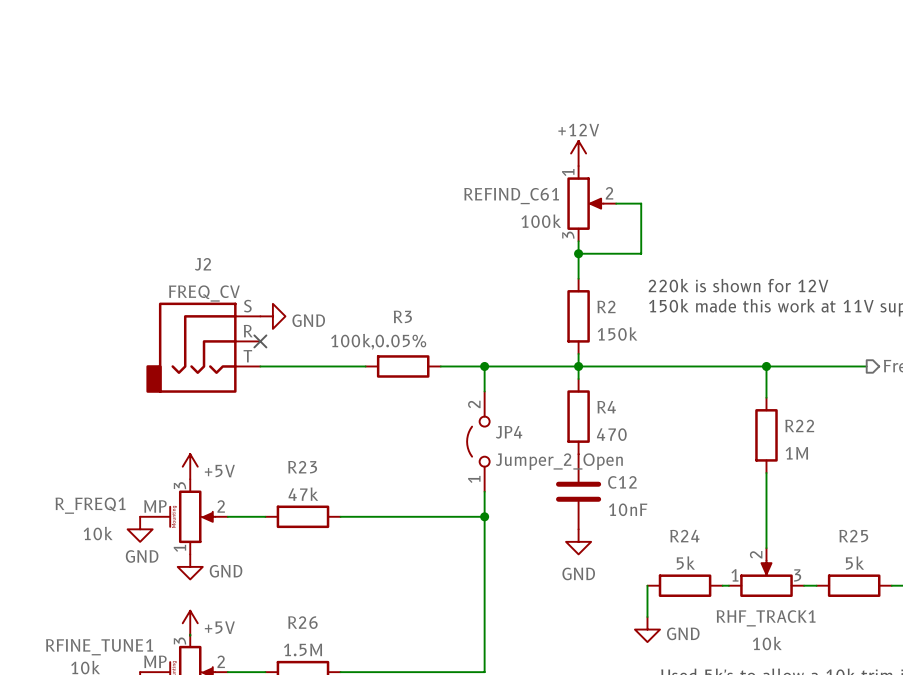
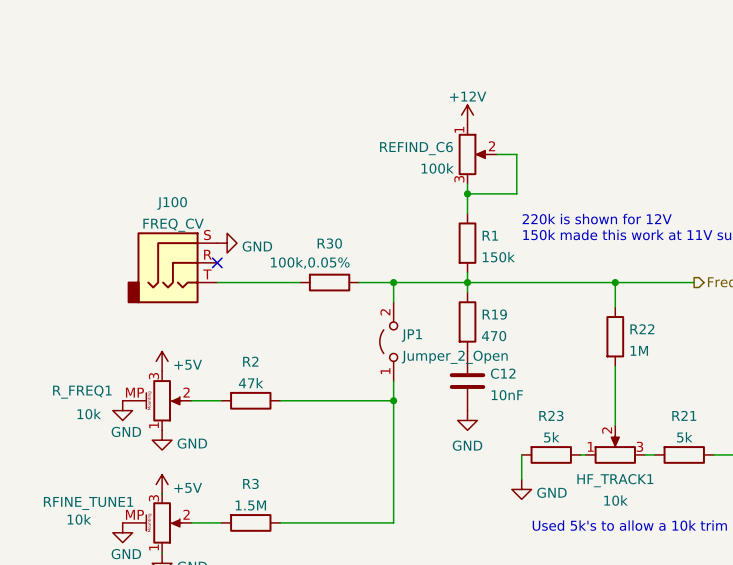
REFIND_C61 name: REFIND_C61 (511, 196) -> REFIND_C6 (416, 148)
J2 name: J2 (203, 264) -> J100 (172, 203)
R2 name: R2 (606, 306) -> R1 (490, 235)
R3 name: R3 (402, 316) -> R30 (329, 243)
R4 name: R4 (606, 407) -> R19 (494, 314)
JP4 name: JP4 (509, 432) -> JP1 (411, 335)
R23 name: R23 (302, 467) -> R2 (250, 361)
R24 name: R24 (684, 536) -> R23 (551, 415)
R25 name: R25 (853, 536) -> R21 (684, 415)
RHF_TRACK1 name: RHF_TRACK1 (766, 618) -> HF_TRACK1 (615, 480)
R26 name: R26 (302, 622) -> R3 (250, 483)

